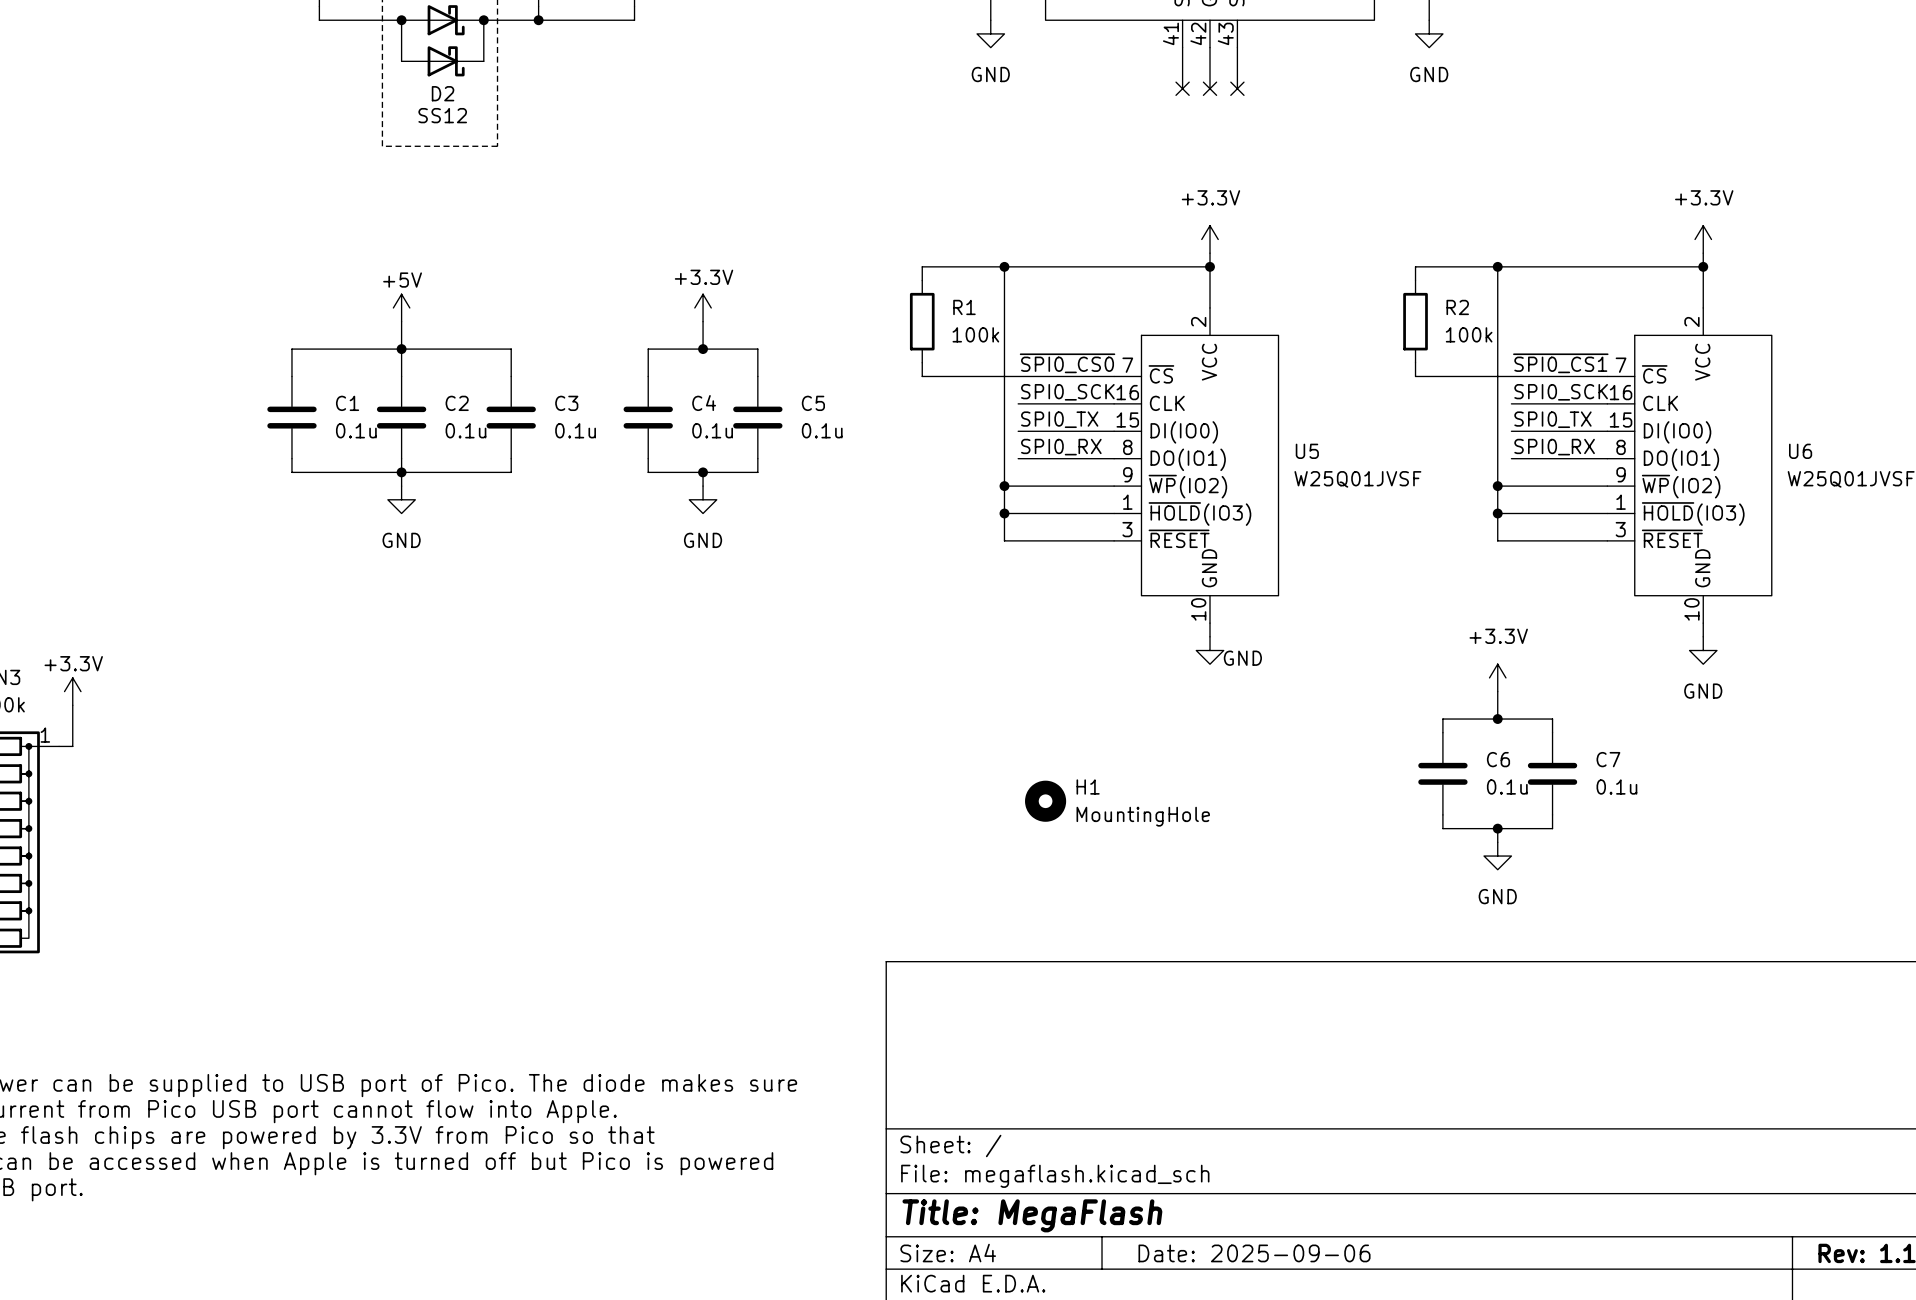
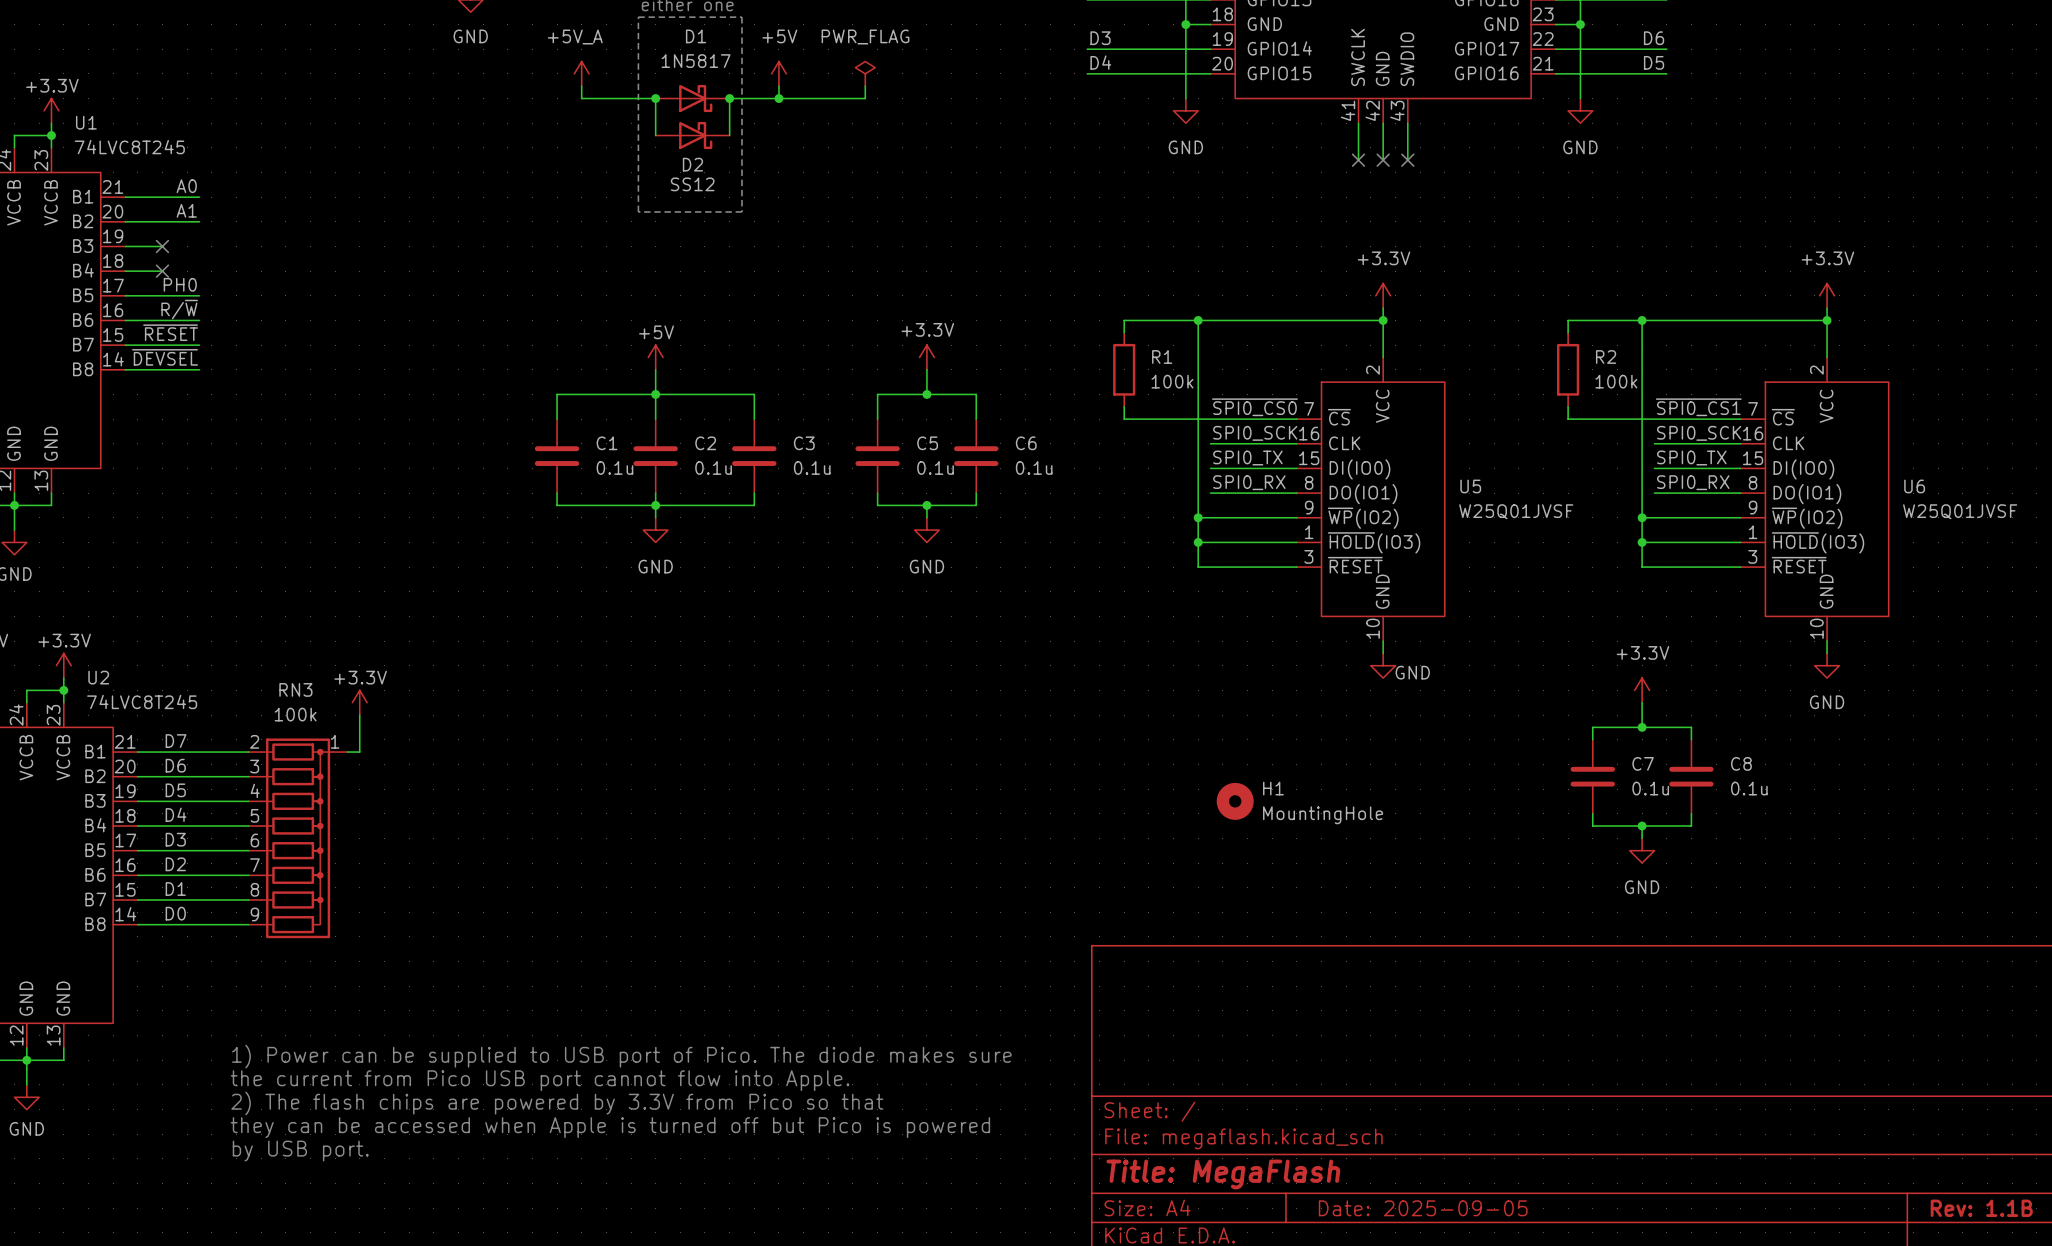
C4 name: C4 (704, 403) -> C5 (927, 443)
C5 name: C5 (813, 403) -> C6 (1026, 443)
C6 name: C6 (1498, 759) -> C7 (1643, 763)
C7 name: C7 (1608, 759) -> C8 (1741, 763)
title block: Date: 2025-09-06 (1254, 1253) -> Date: 2025-09-05 (1423, 1208)

